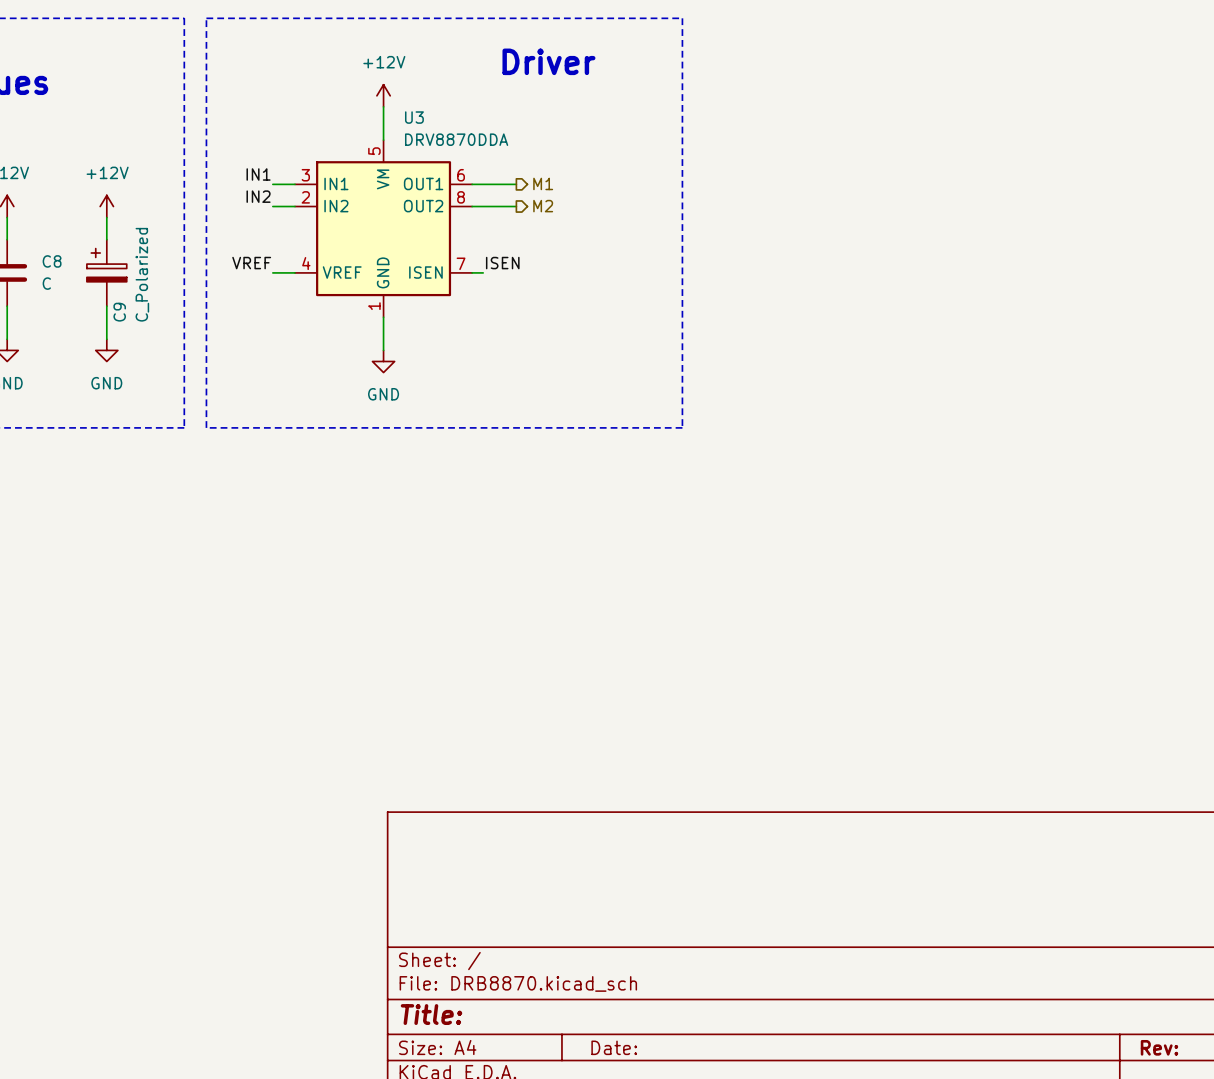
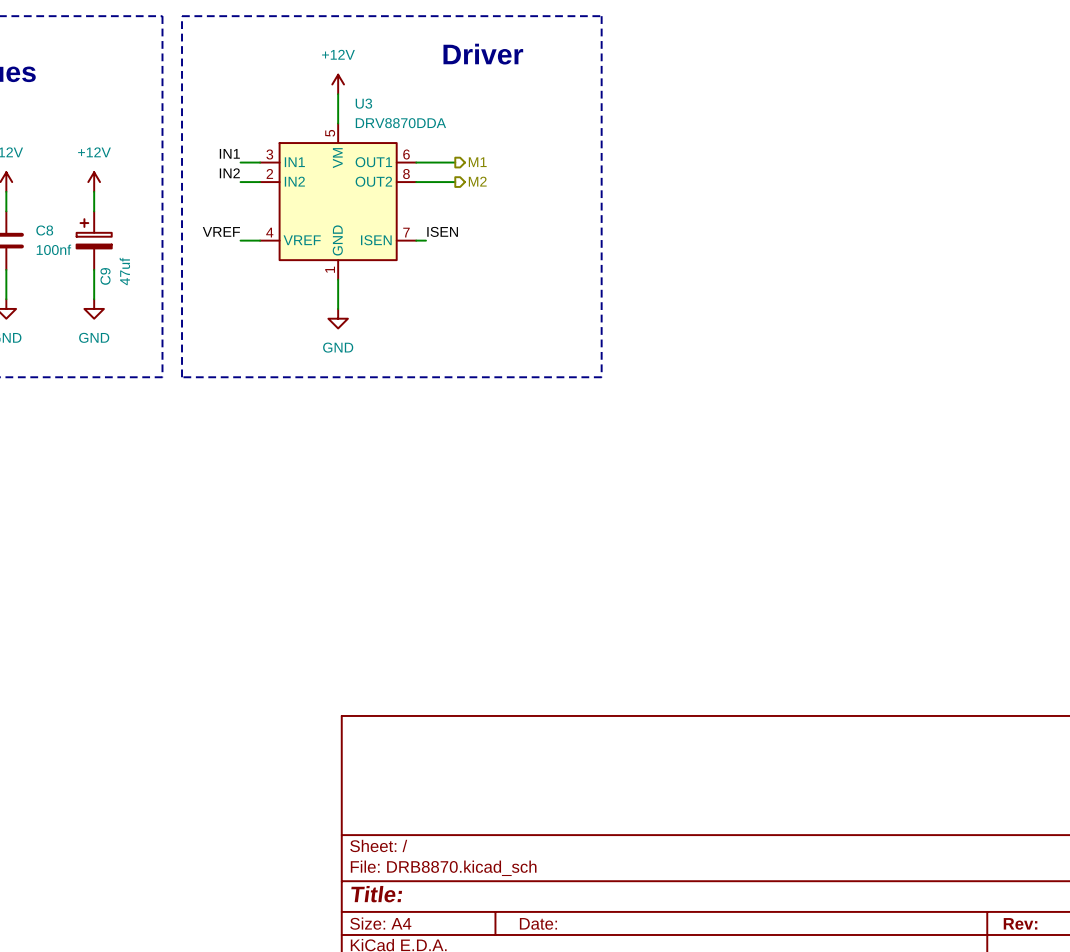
C9 value: C_Polarized (142, 274) -> 47uf (124, 271)
C8 value: C (46, 283) -> 100nf (53, 249)

